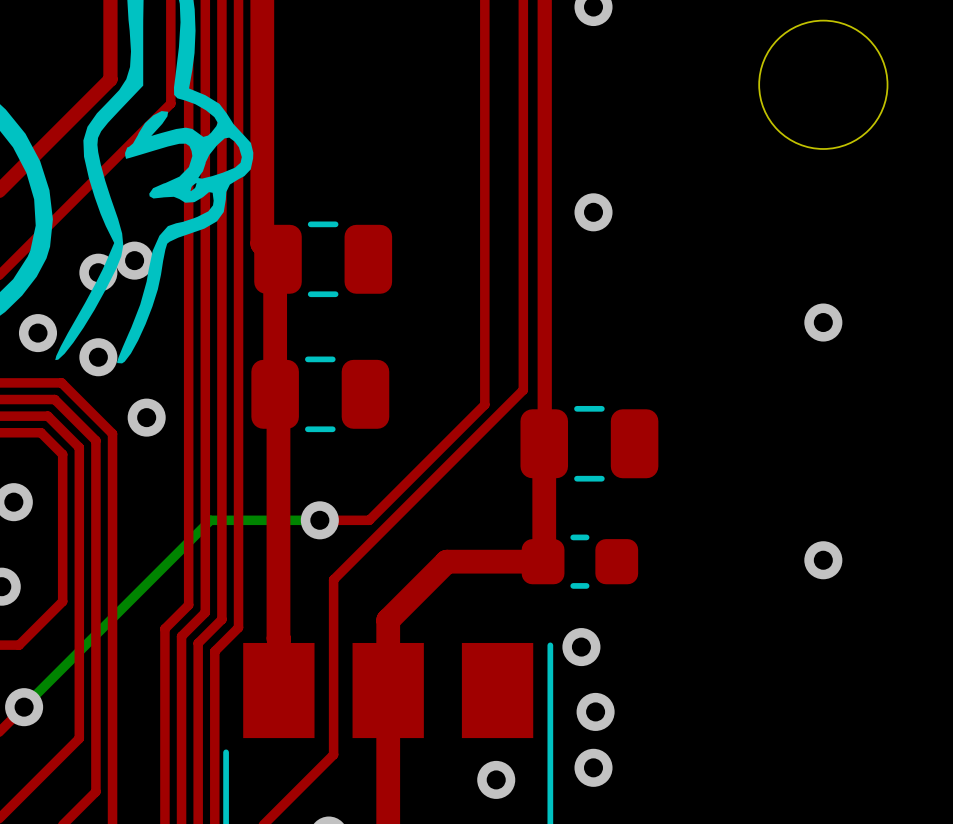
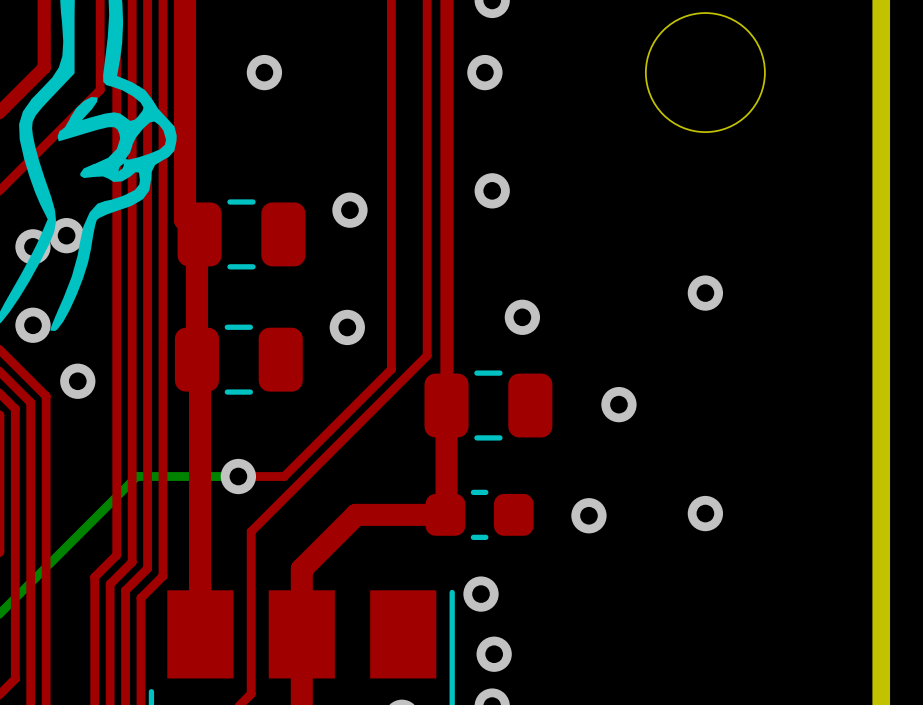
via: none -> (264, 72)
via: none -> (484, 72)
via: none -> (349, 210)
via: none -> (522, 317)
via: none -> (347, 327)
via: none -> (618, 404)
via: none -> (588, 515)

